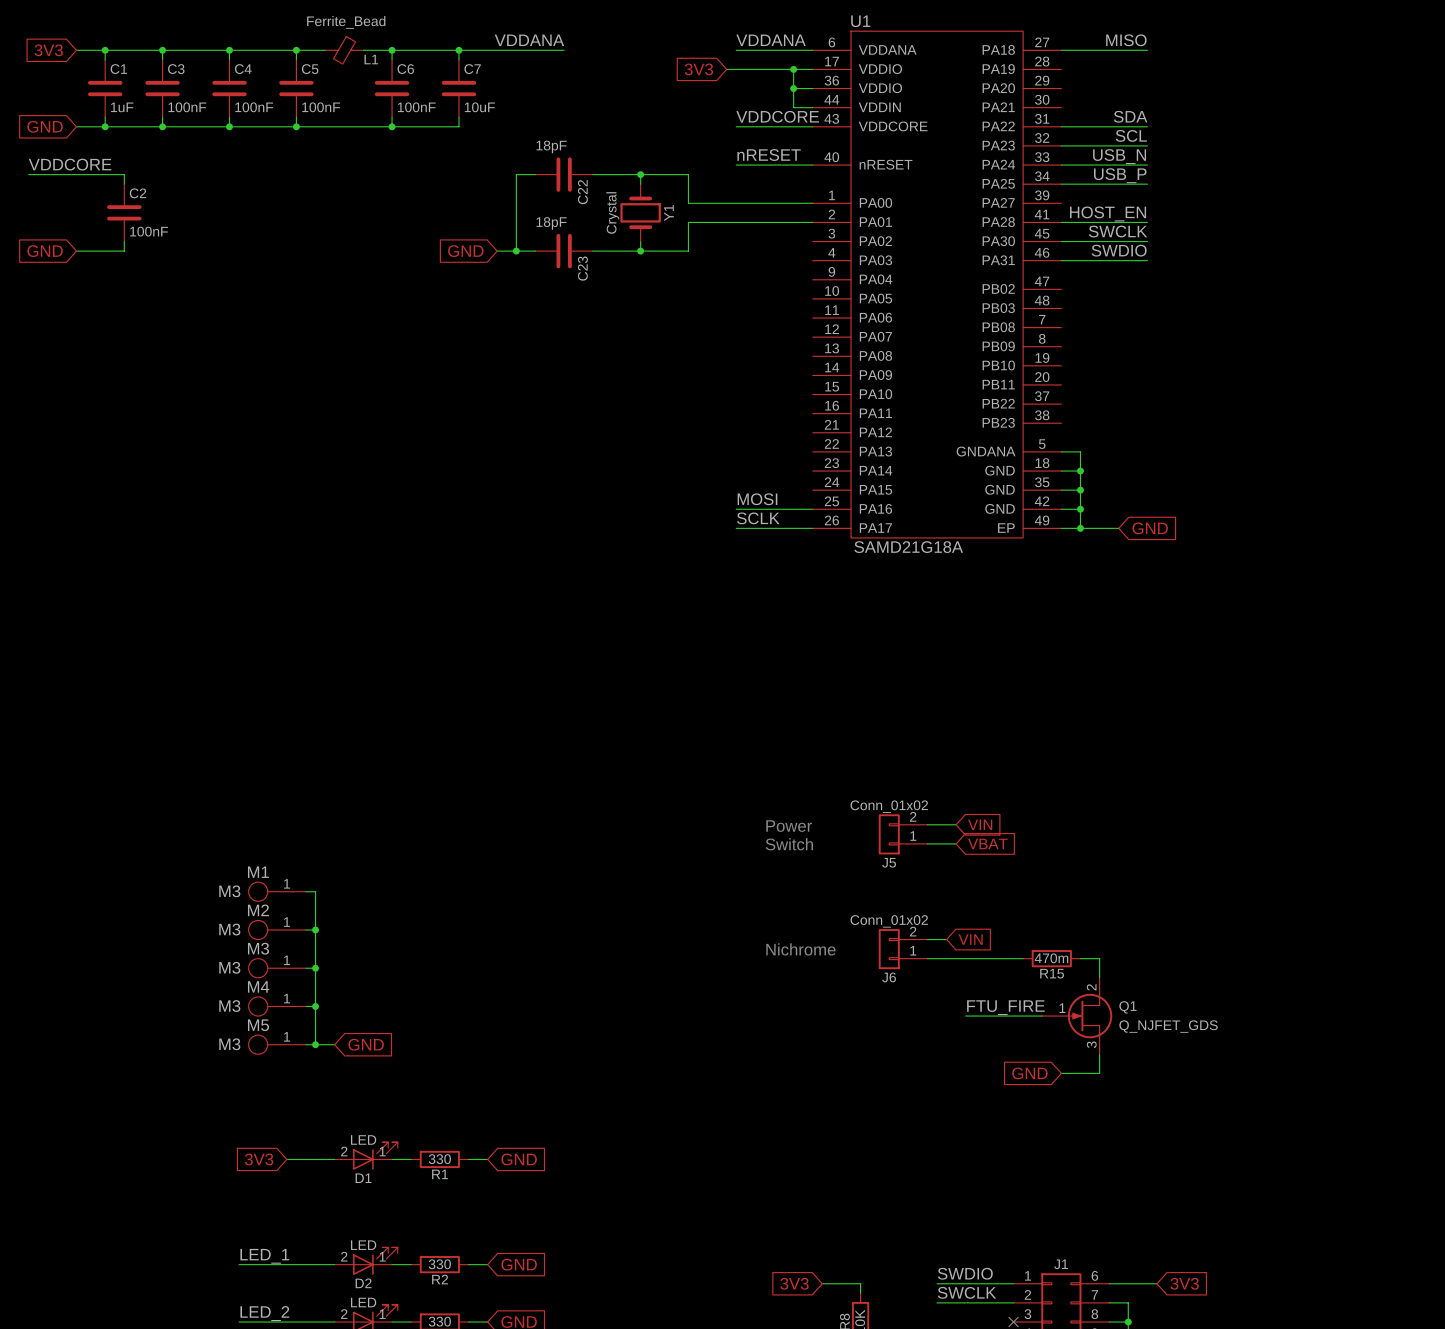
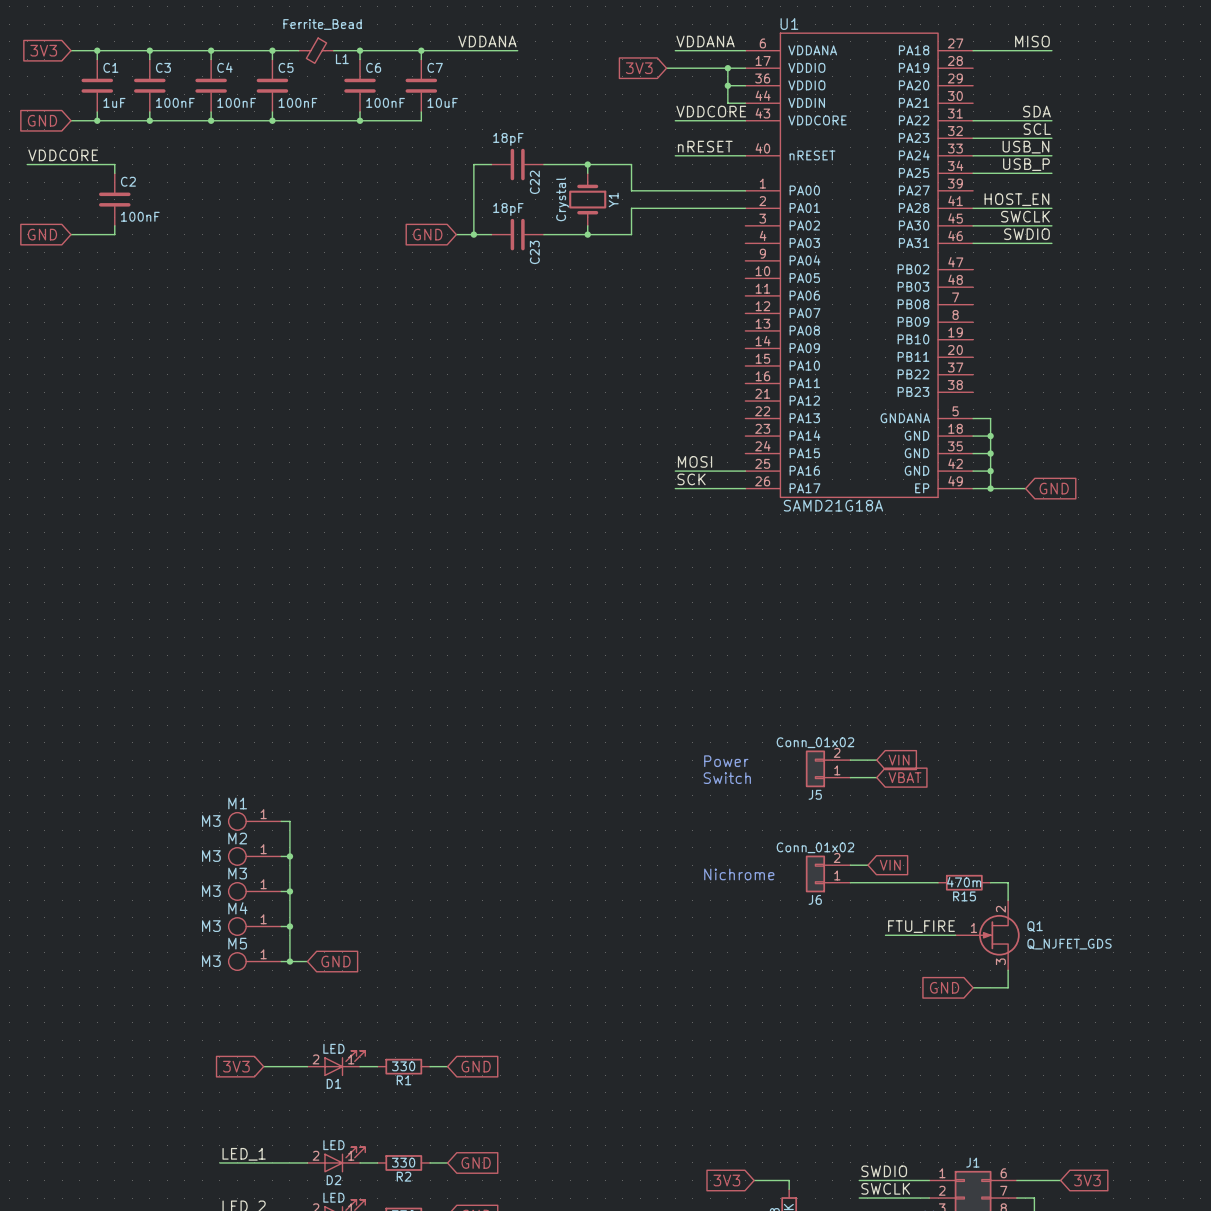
label: SCLK (758, 518) -> SCK (691, 479)

